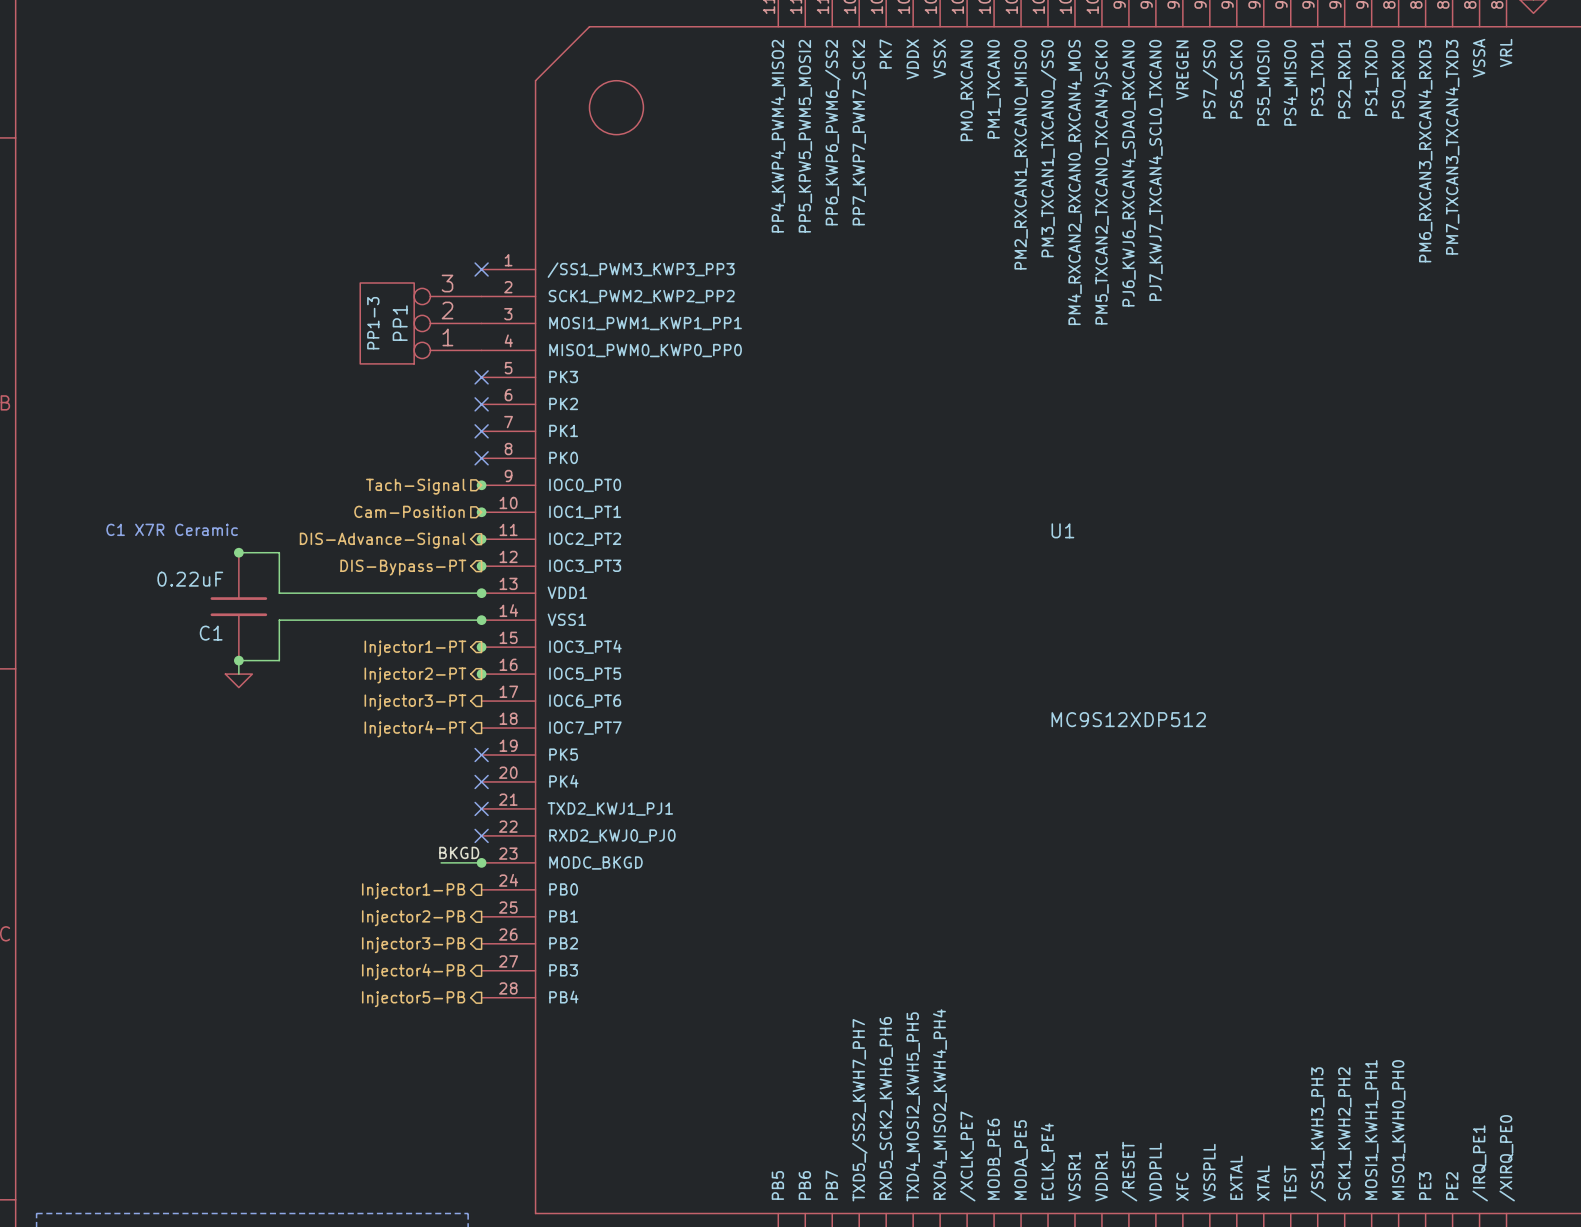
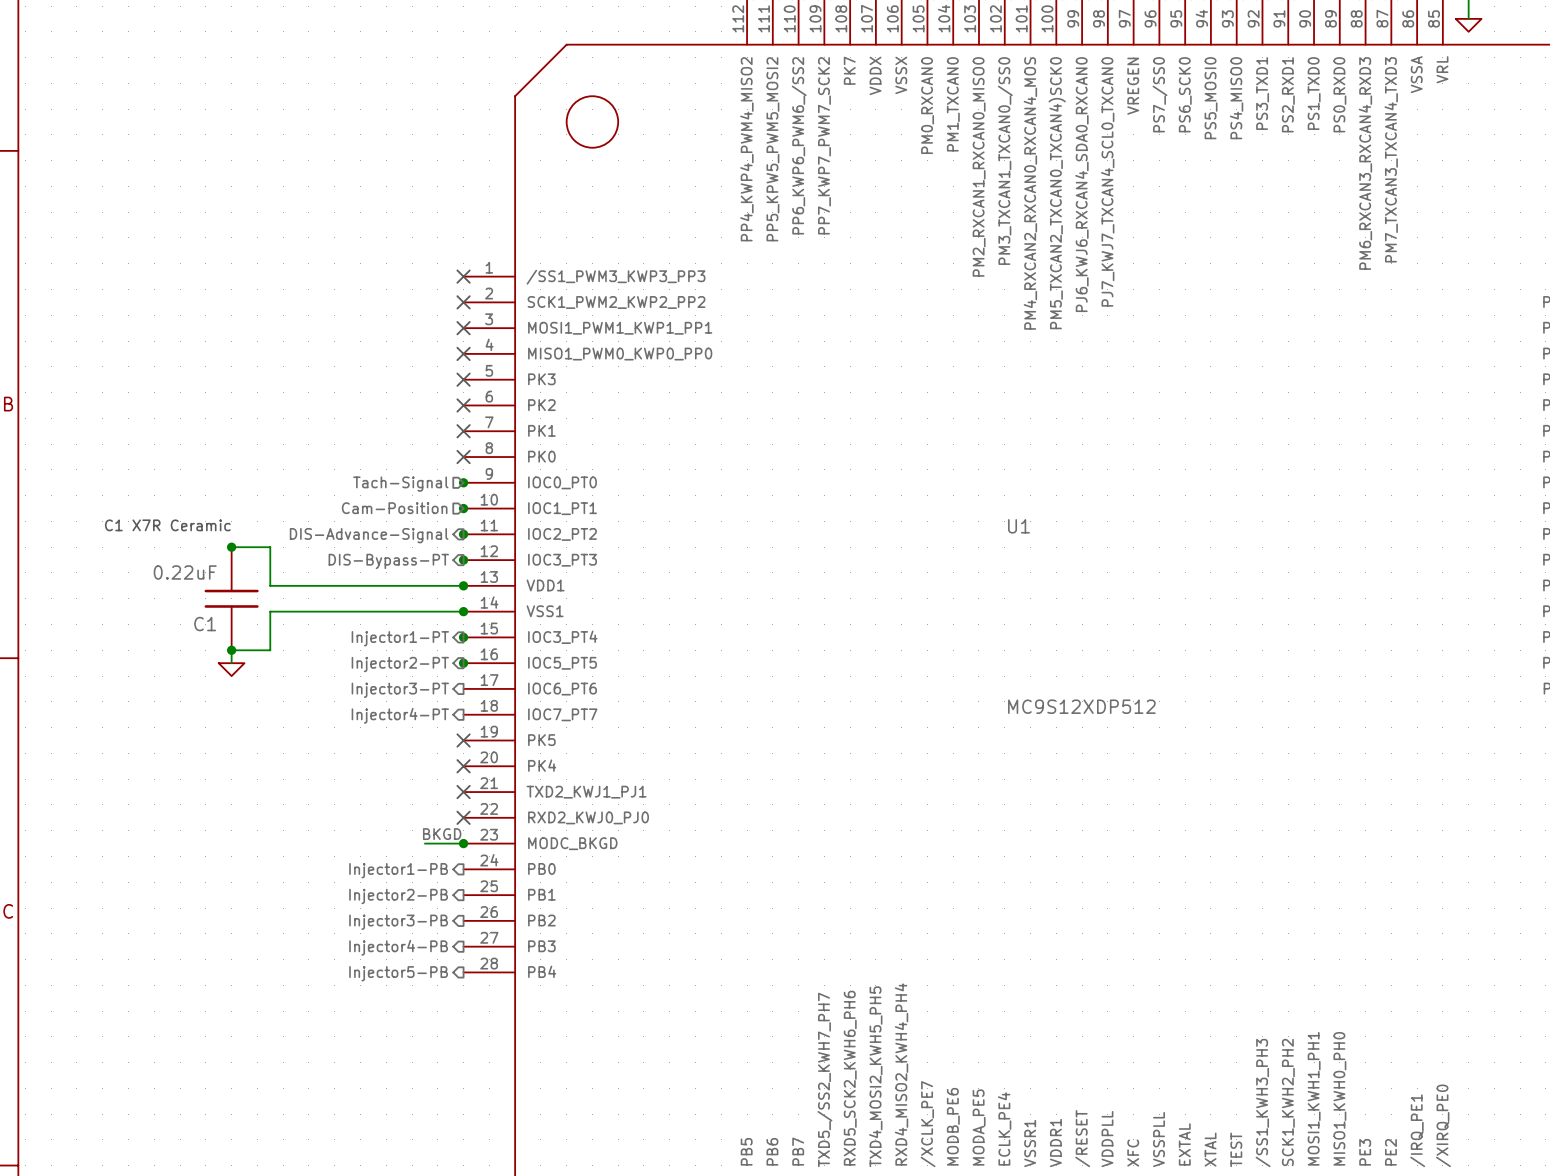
no-connect mark: none -> (463, 302)
PP1: PP1-3 (420, 323) -> none
no-connect mark: none -> (463, 328)
no-connect mark: none -> (463, 353)

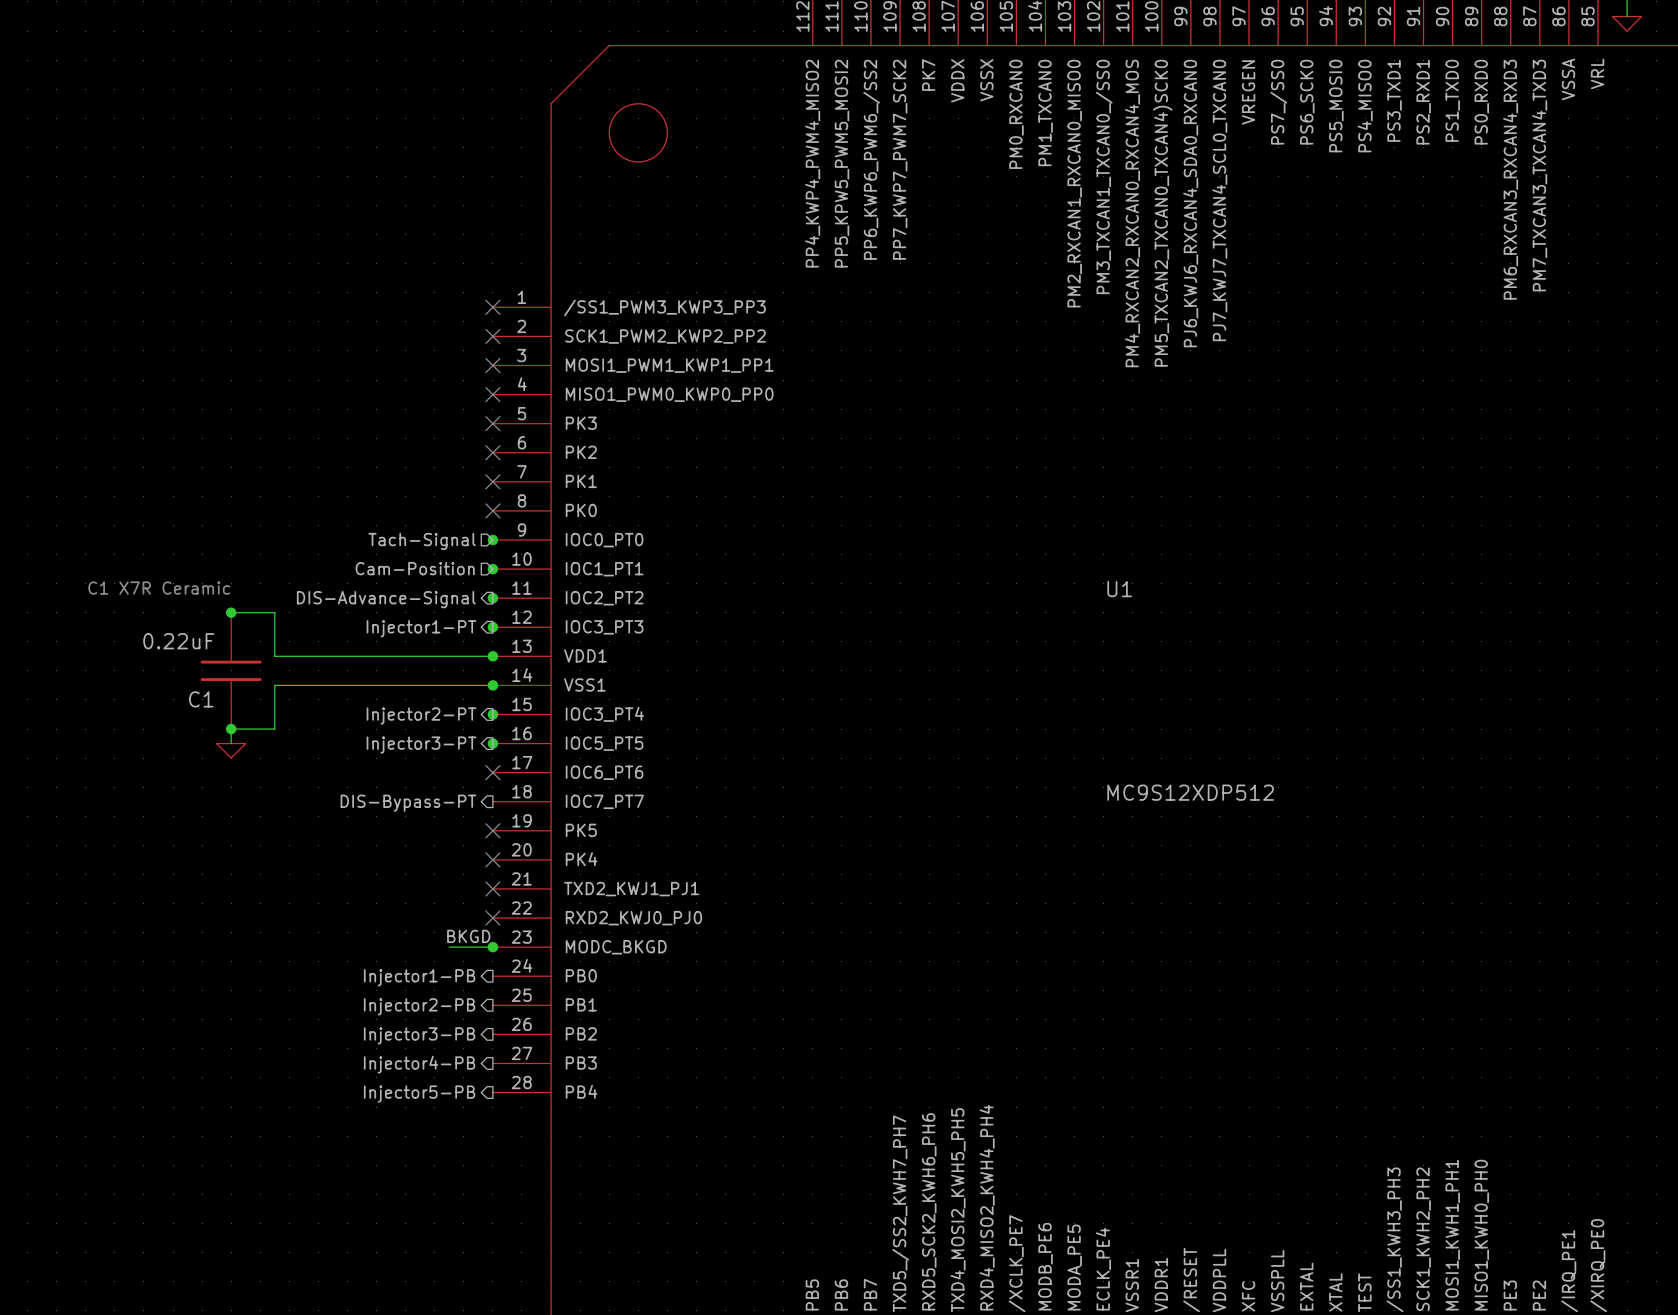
hierarchical label: DIS-Bypass-PT (388, 561) -> Injector1-PT (421, 628)
hierarchical label: Injector1-PT (400, 638) -> Injector2-PT (421, 715)
hierarchical label: Injector2-PT (400, 664) -> Injector3-PT (421, 745)
no-connect mark: none -> (492, 772)
hierarchical label: Injector3-PT (400, 690) -> none
hierarchical label: Injector4-PT (400, 715) -> DIS-Bypass-PT (408, 803)

